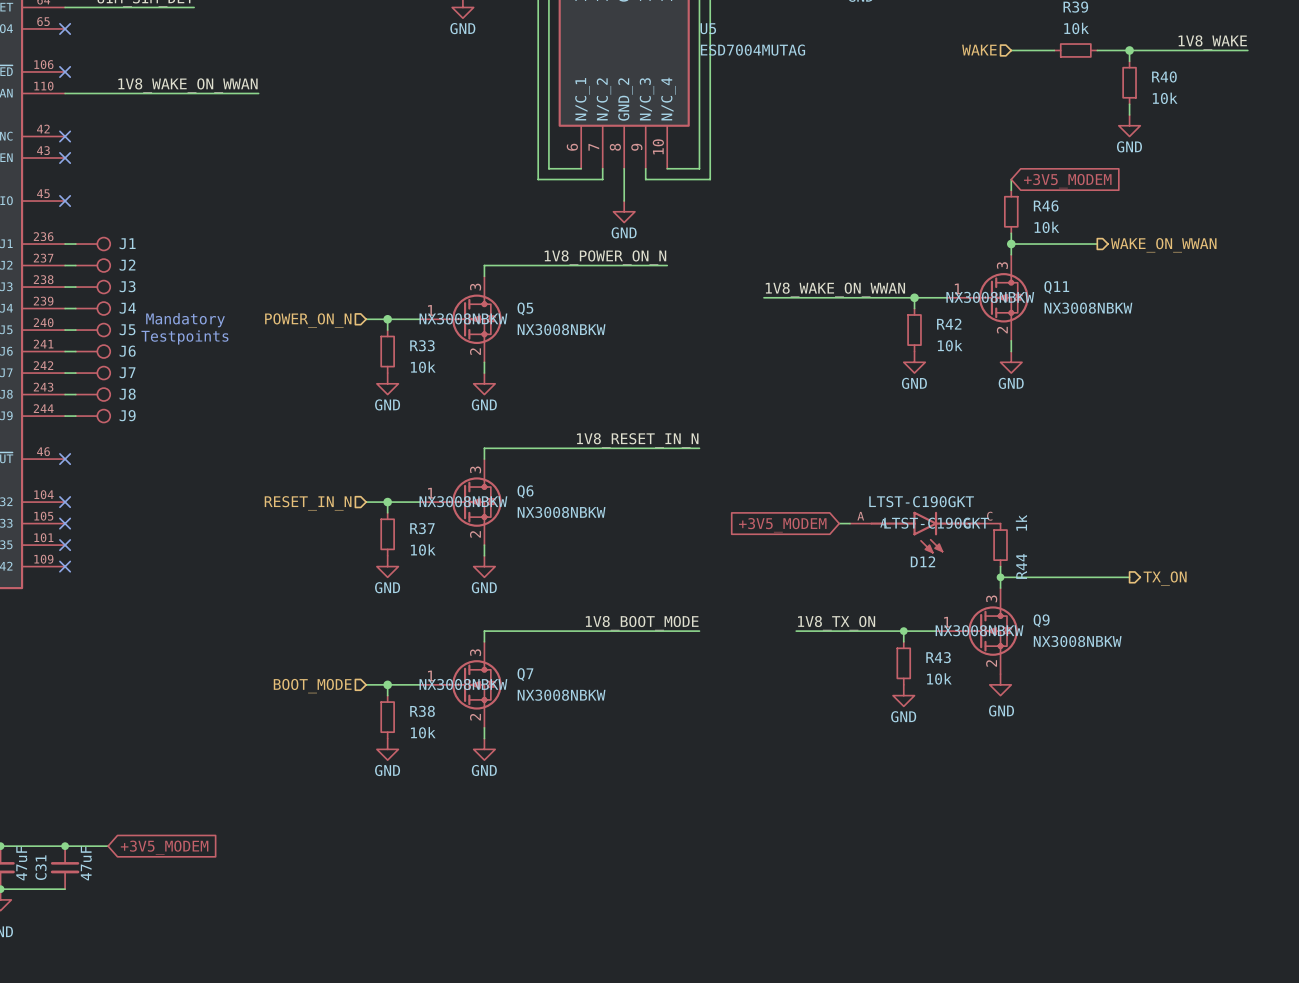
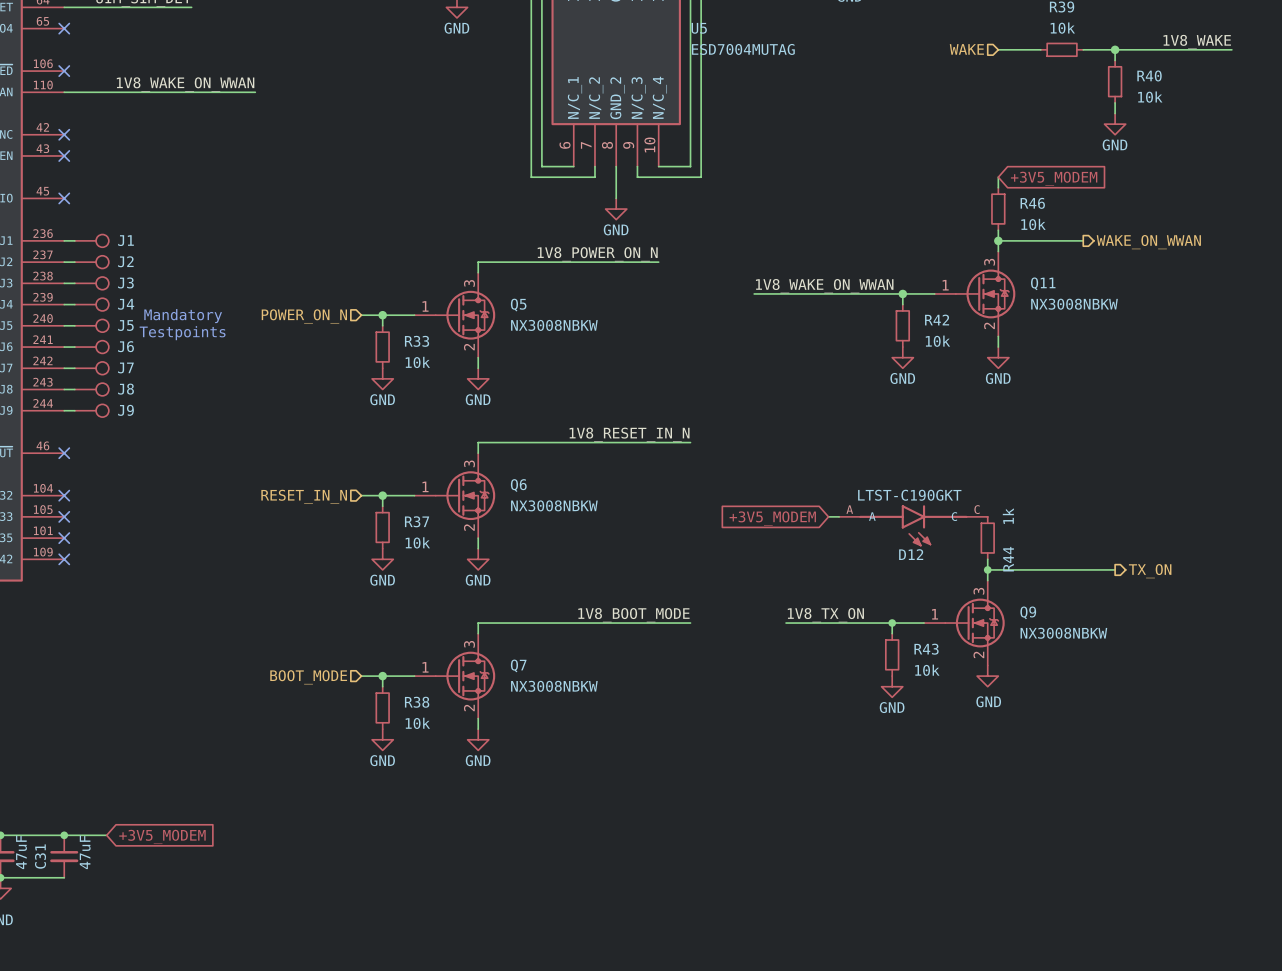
Q11 text: NX3008NBKW (990, 297) -> none
Q5 text: NX3008NBKW (463, 318) -> none
Q6 text: NX3008NBKW (463, 501) -> none
D12 text: LTST-C190GKT (936, 523) -> none
Q9 text: NX3008NBKW (979, 630) -> none
Q7 text: NX3008NBKW (463, 684) -> none

